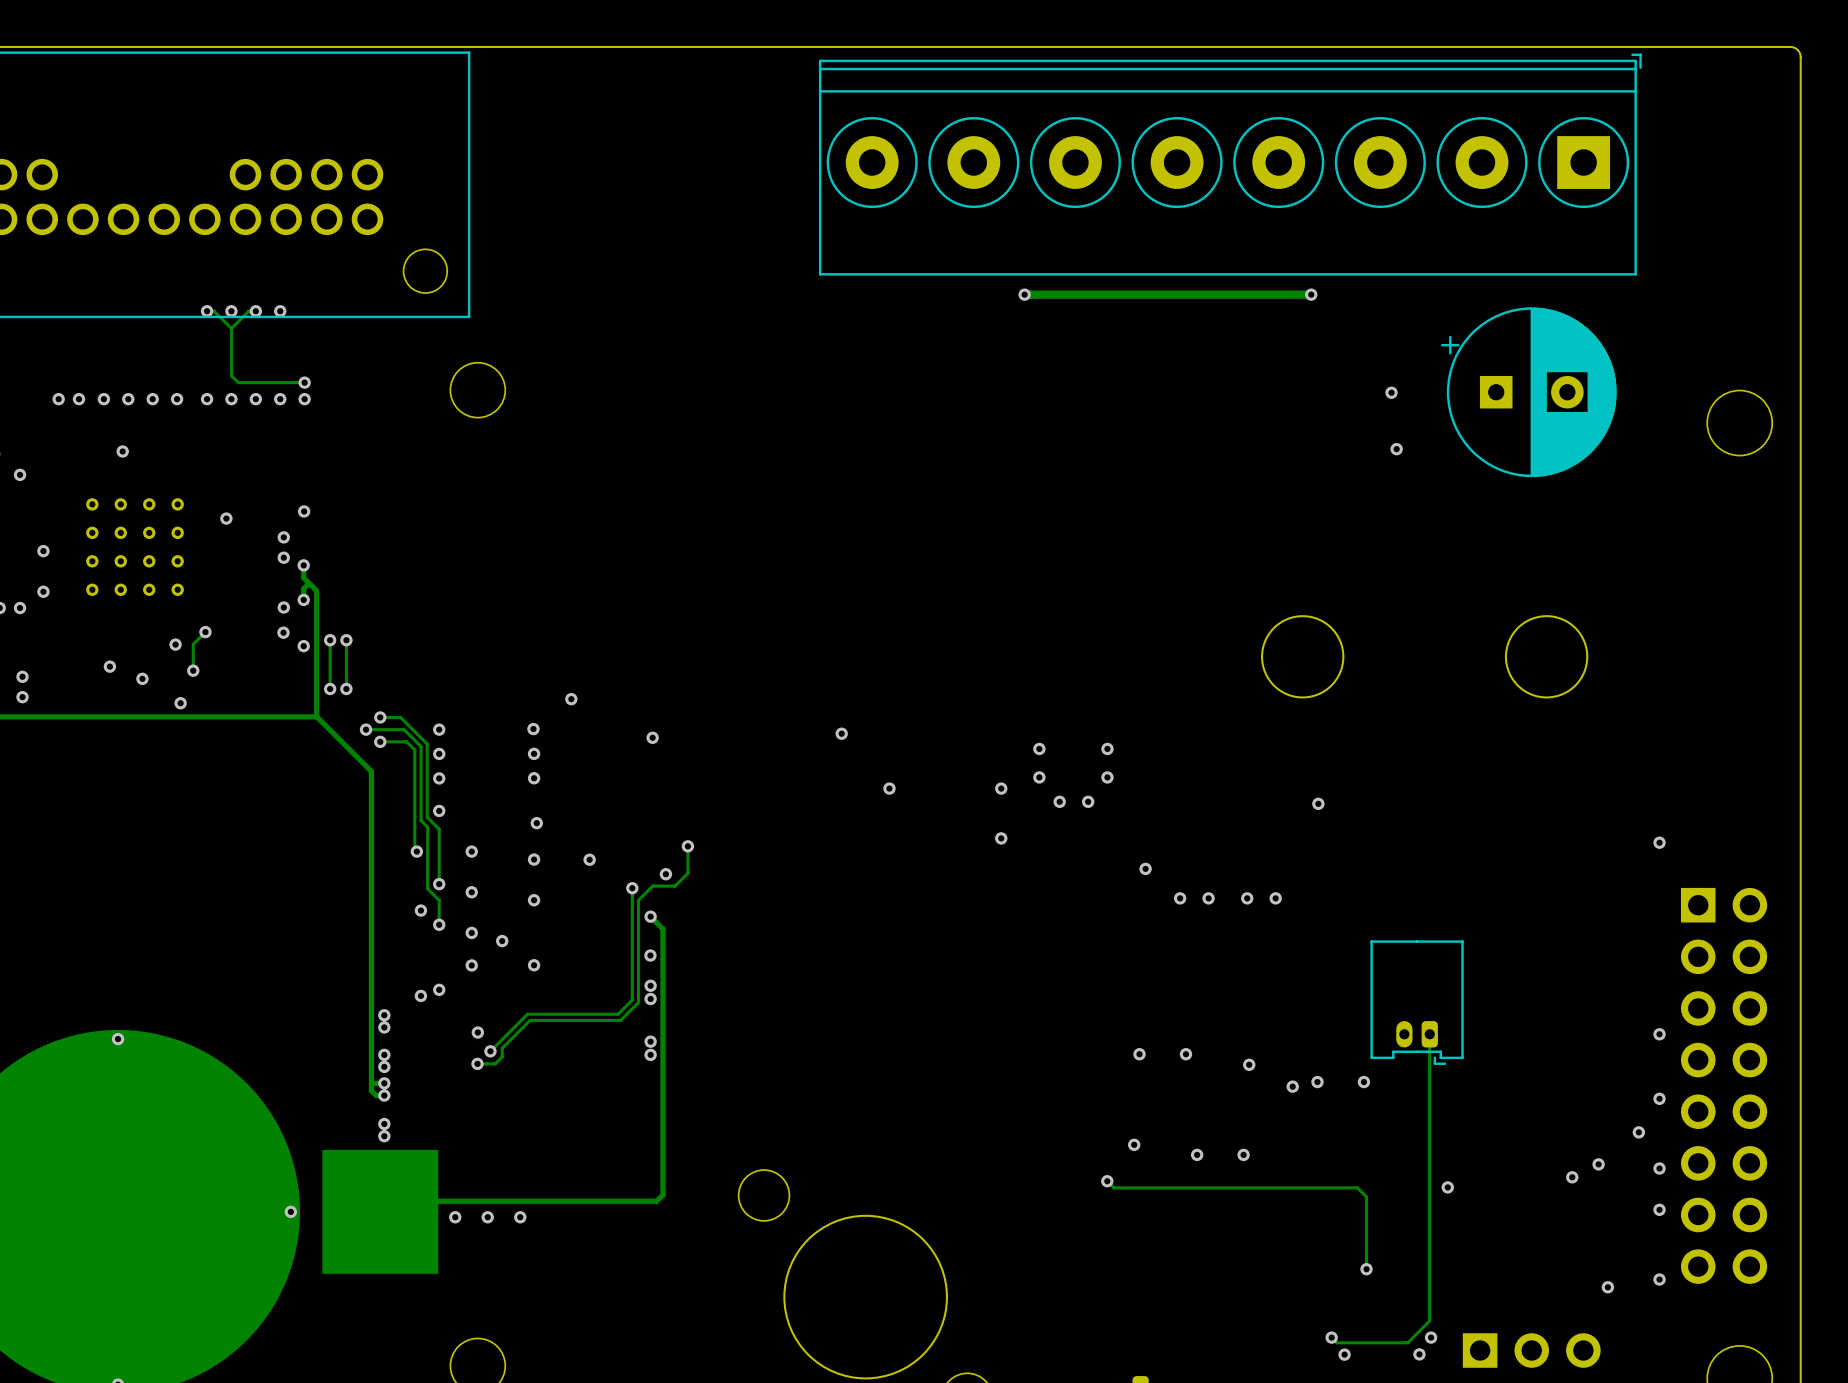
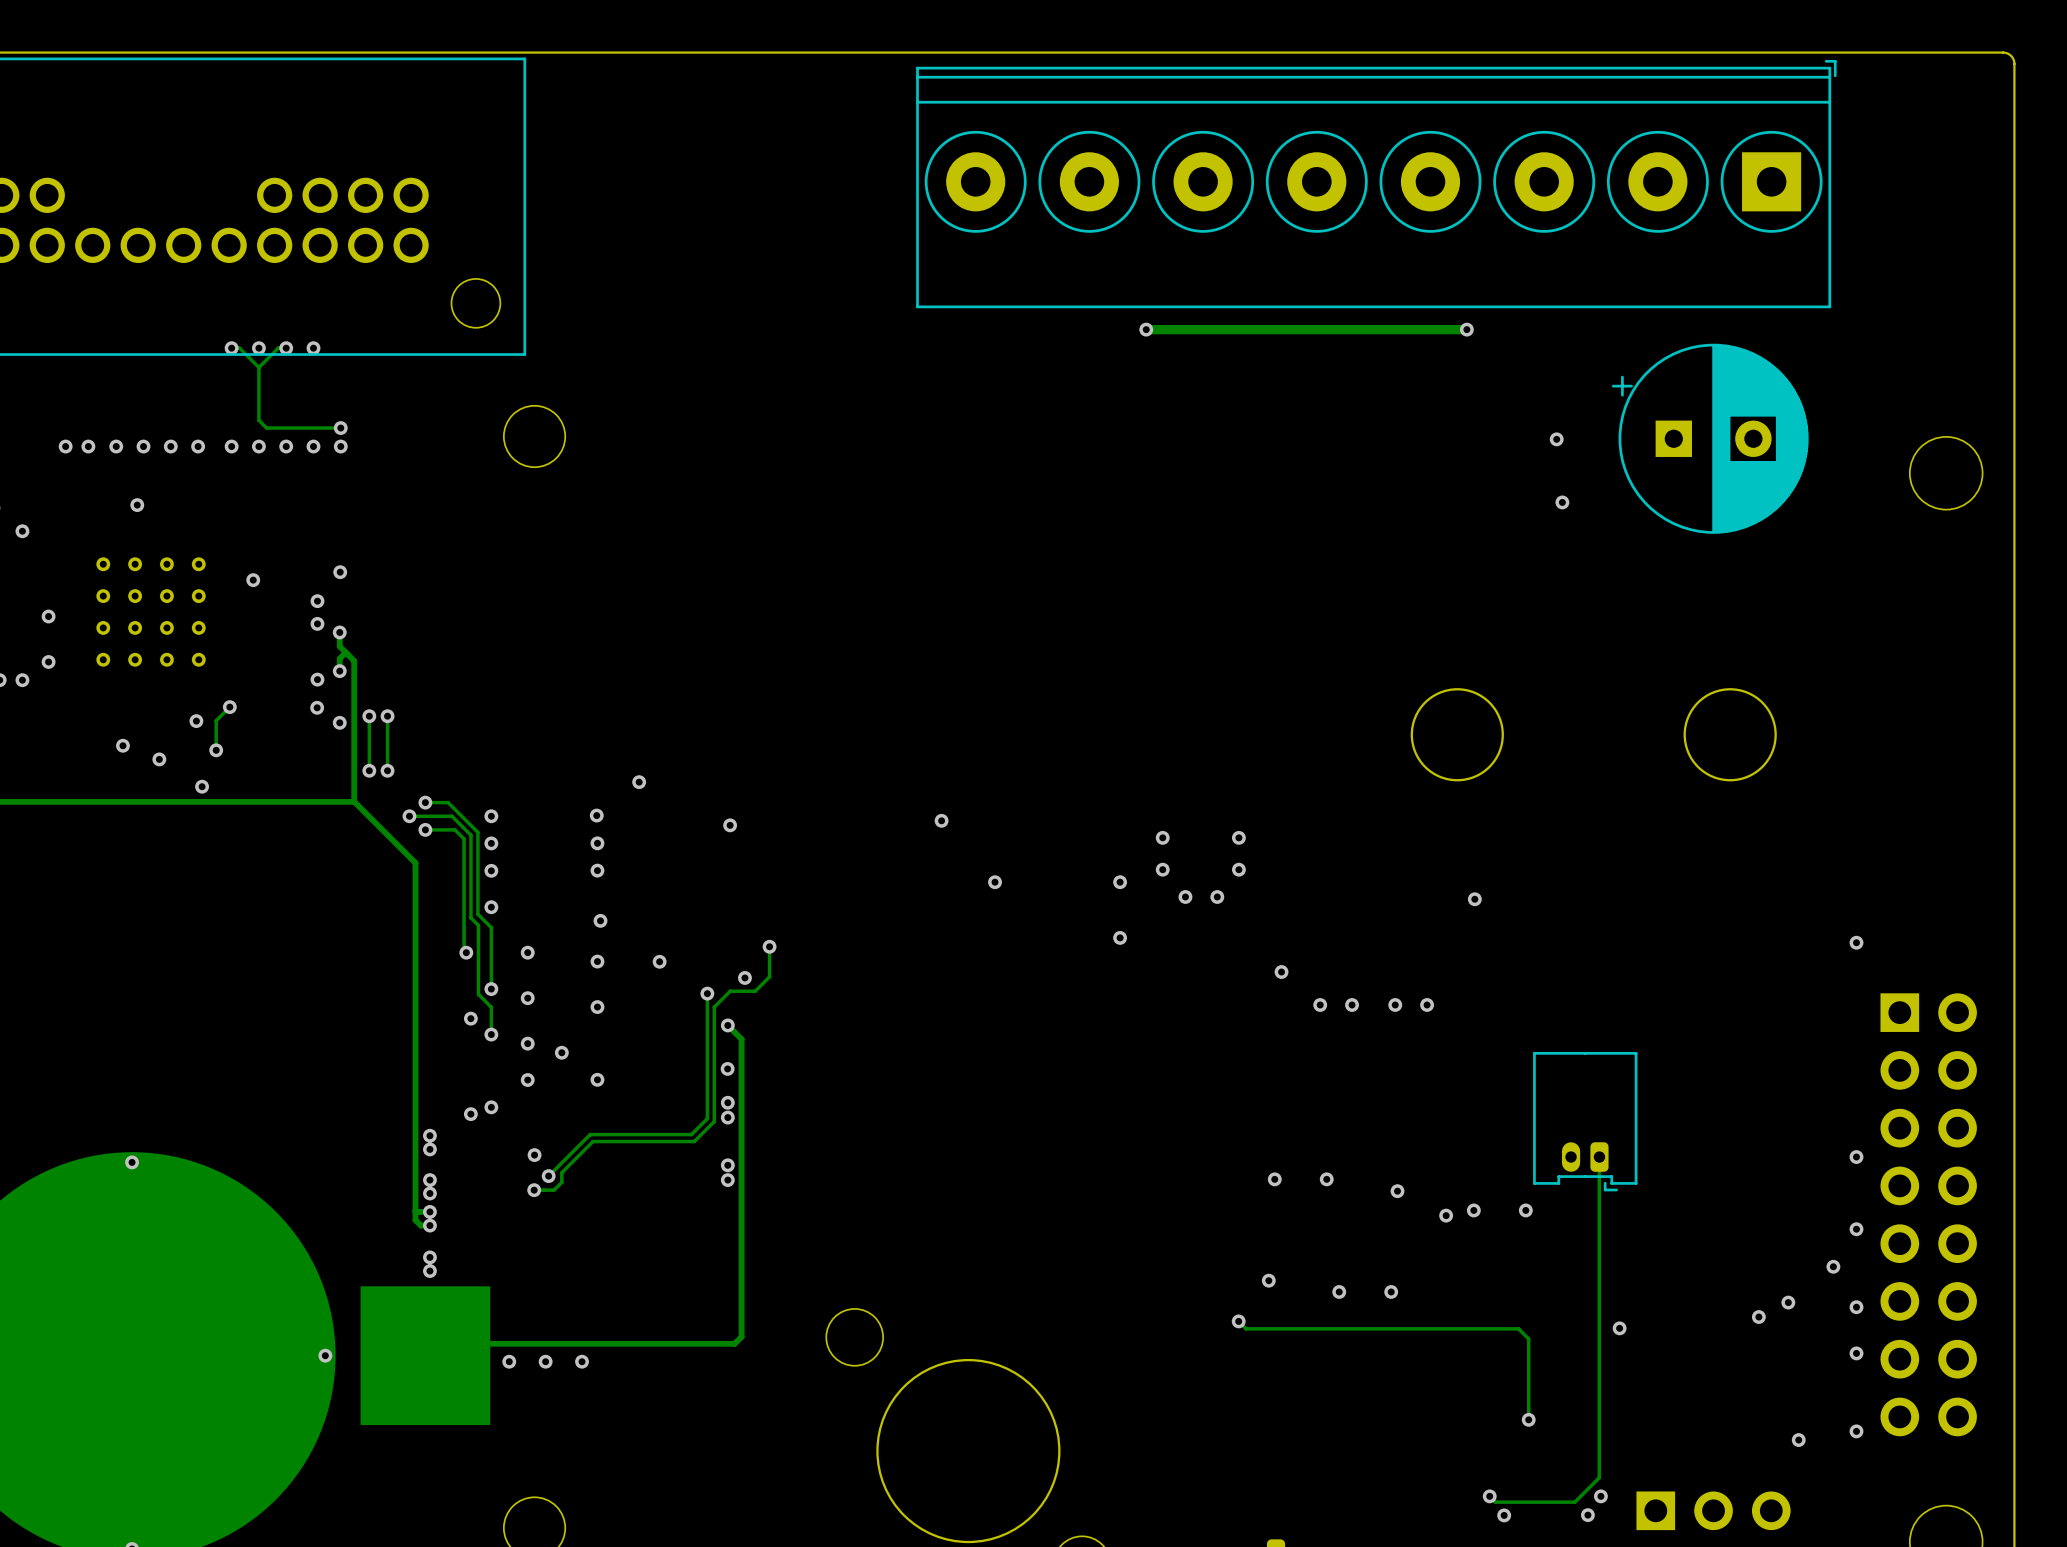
via: (22, 676) -> none
via: (22, 697) -> none

